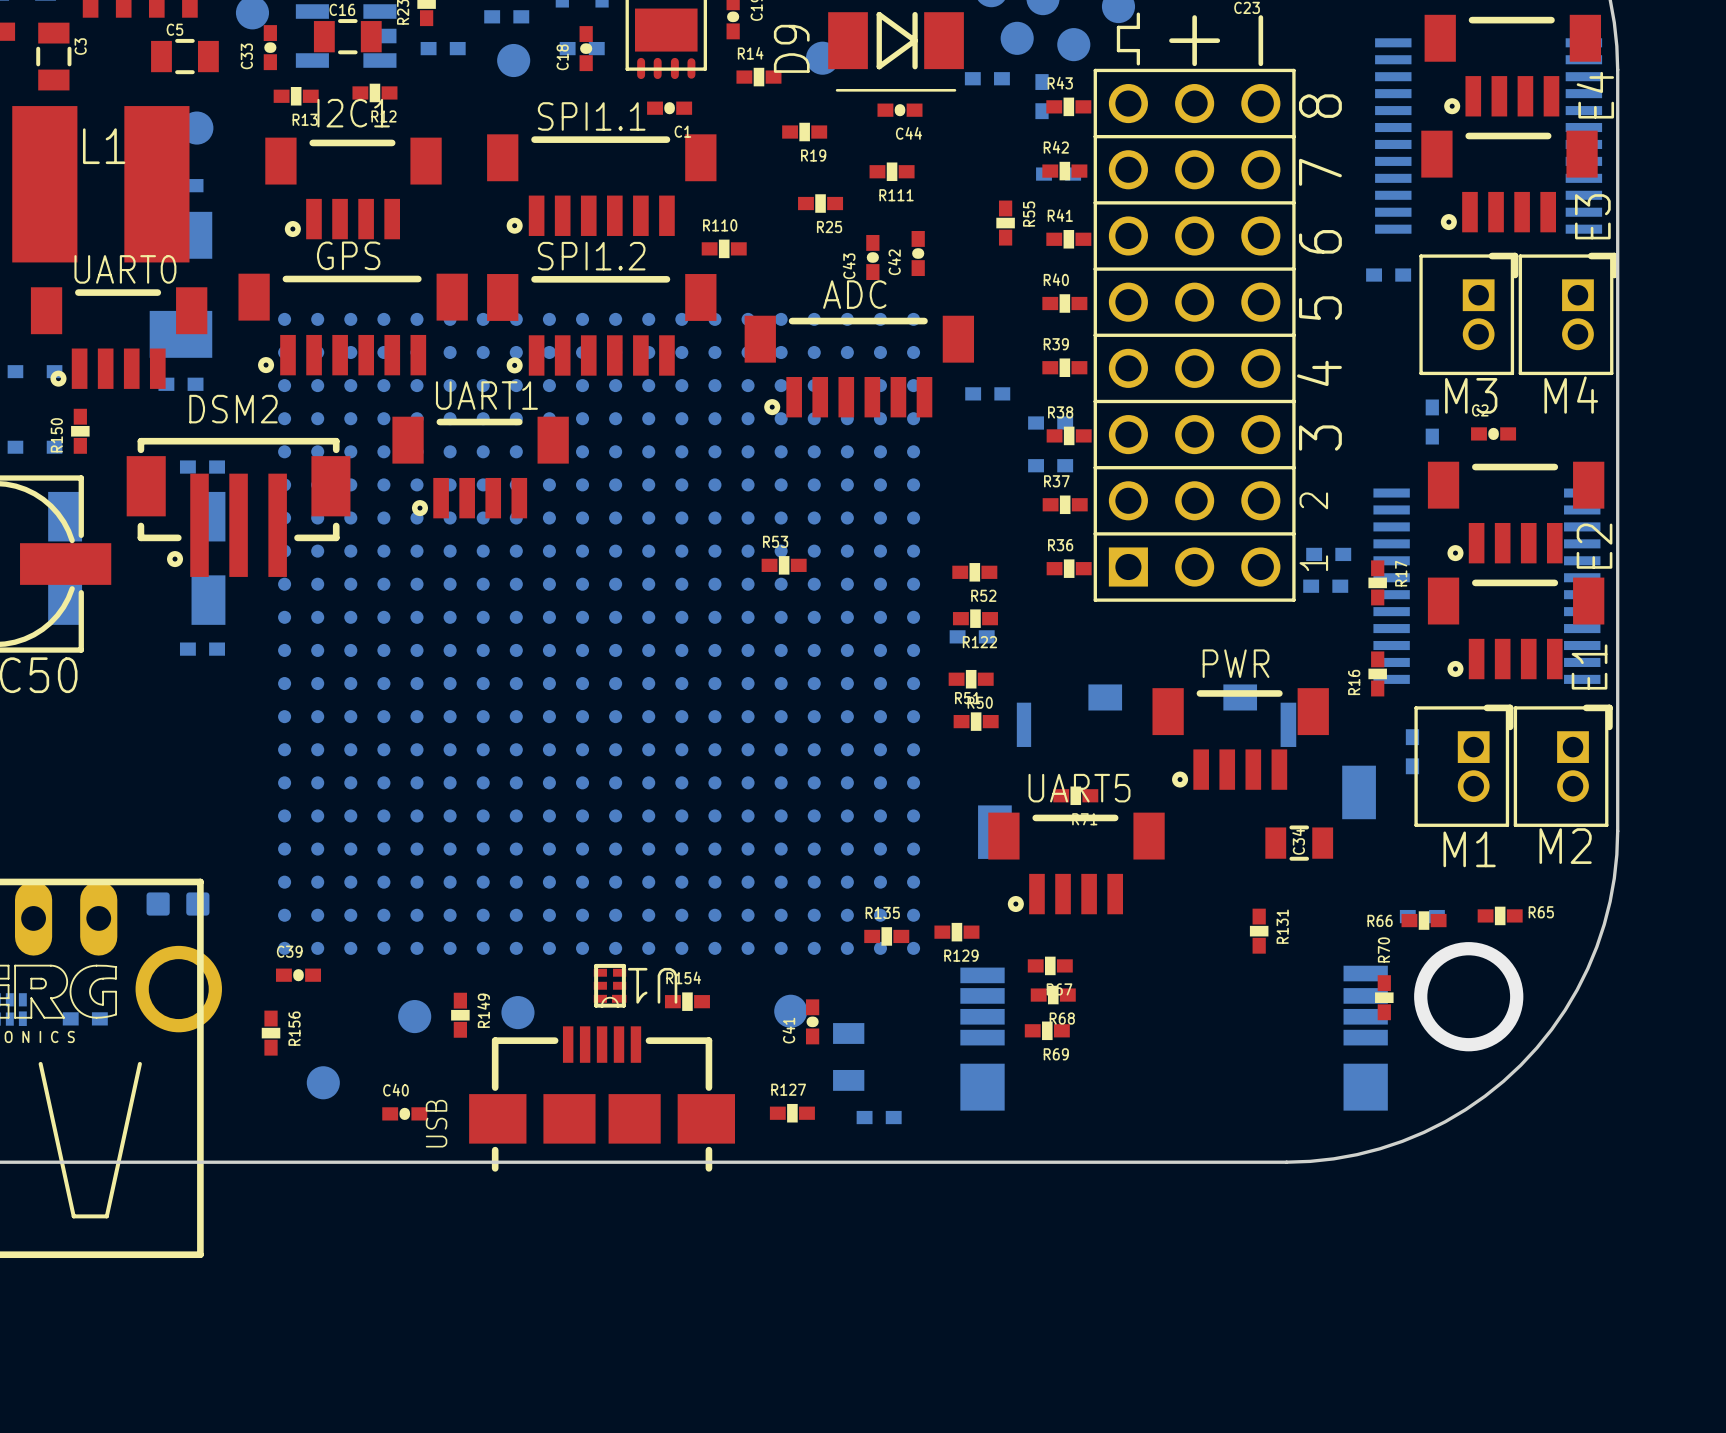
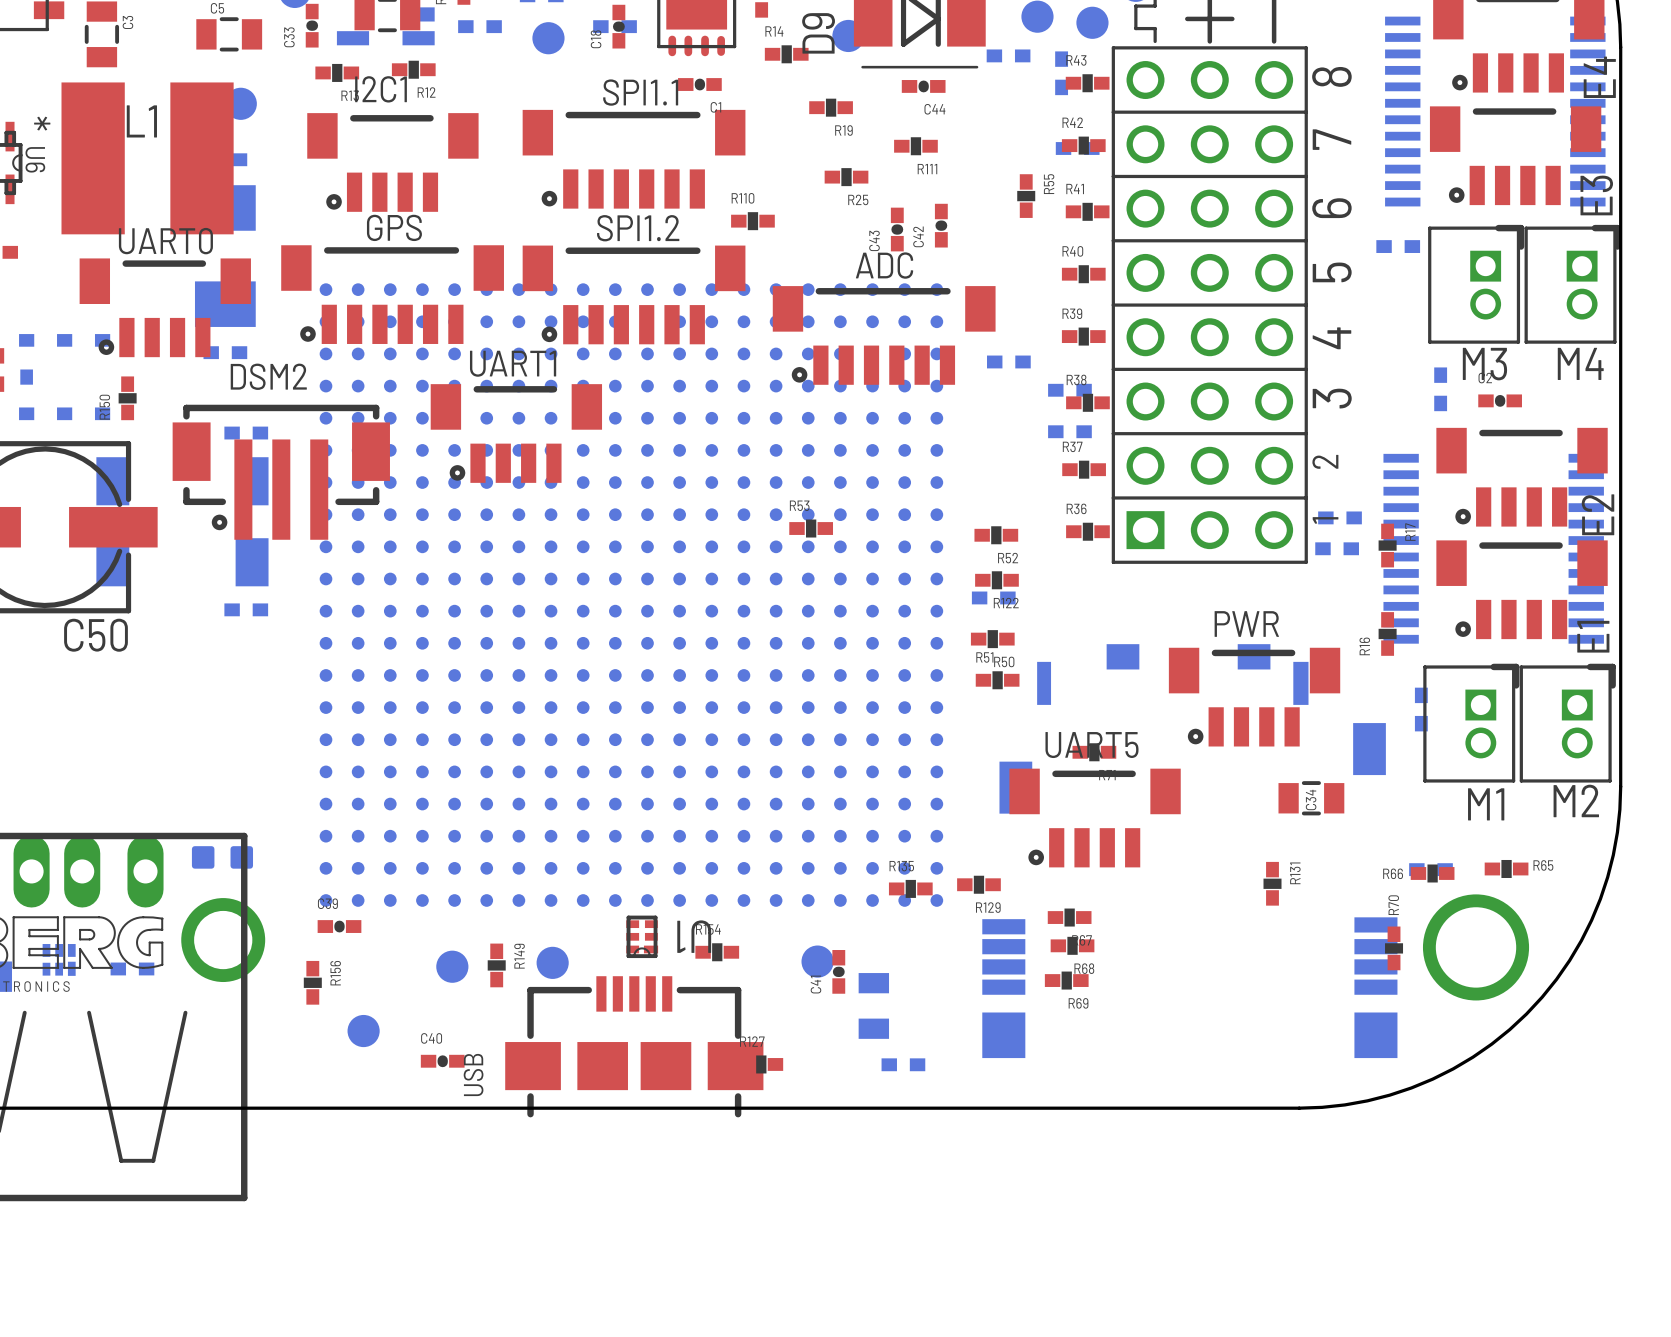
R127 position: (792, 1113) -> (761, 1064)

